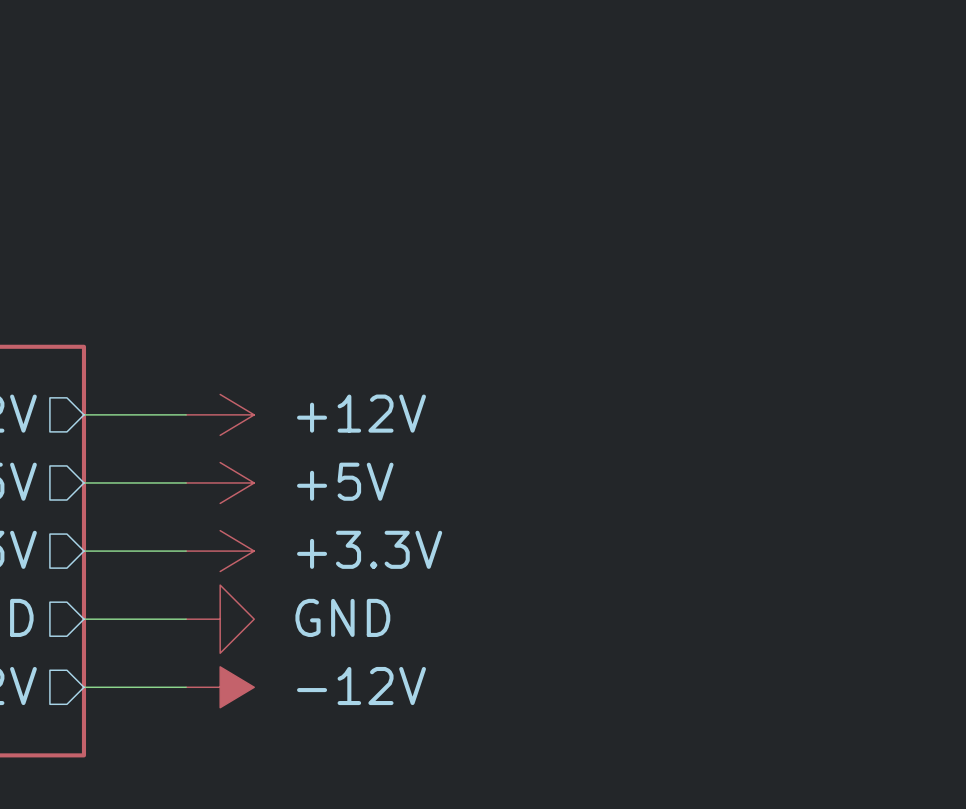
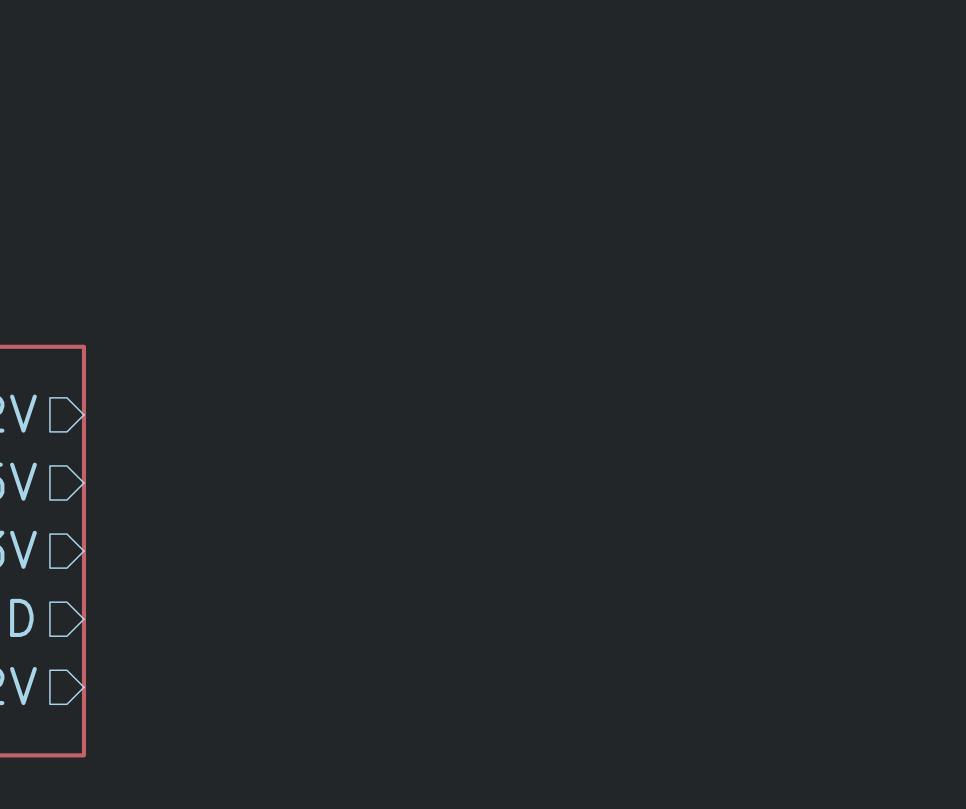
wire: (83, 414) (186, 414) -> none
power symbol: +12V (220, 414) -> none
wire: (83, 482) (186, 482) -> none
power symbol: +5V (220, 482) -> none
wire: (83, 551) (186, 551) -> none
power symbol: +3.3V (220, 551) -> none
wire: (83, 619) (186, 619) -> none
power symbol: GND (220, 619) -> none
wire: (83, 687) (186, 687) -> none
power symbol: -12V (220, 687) -> none

